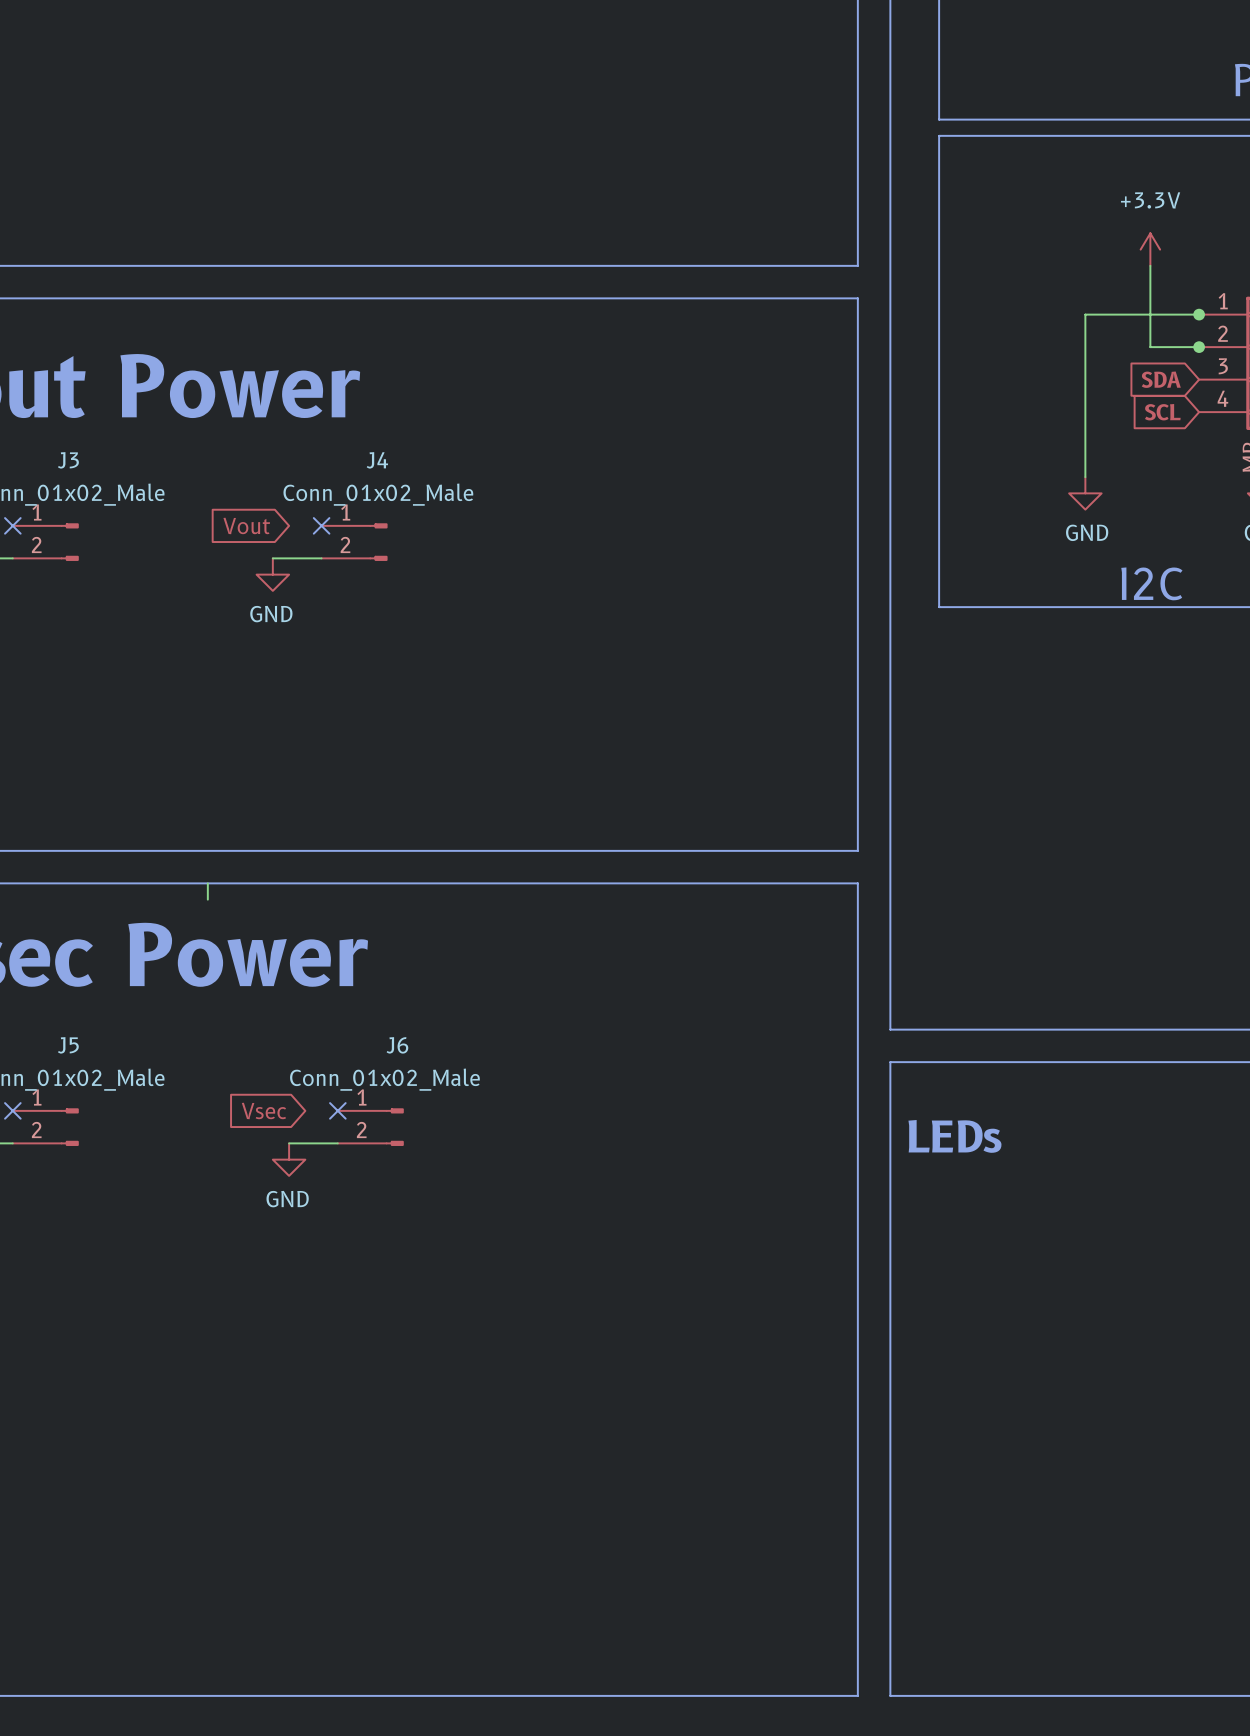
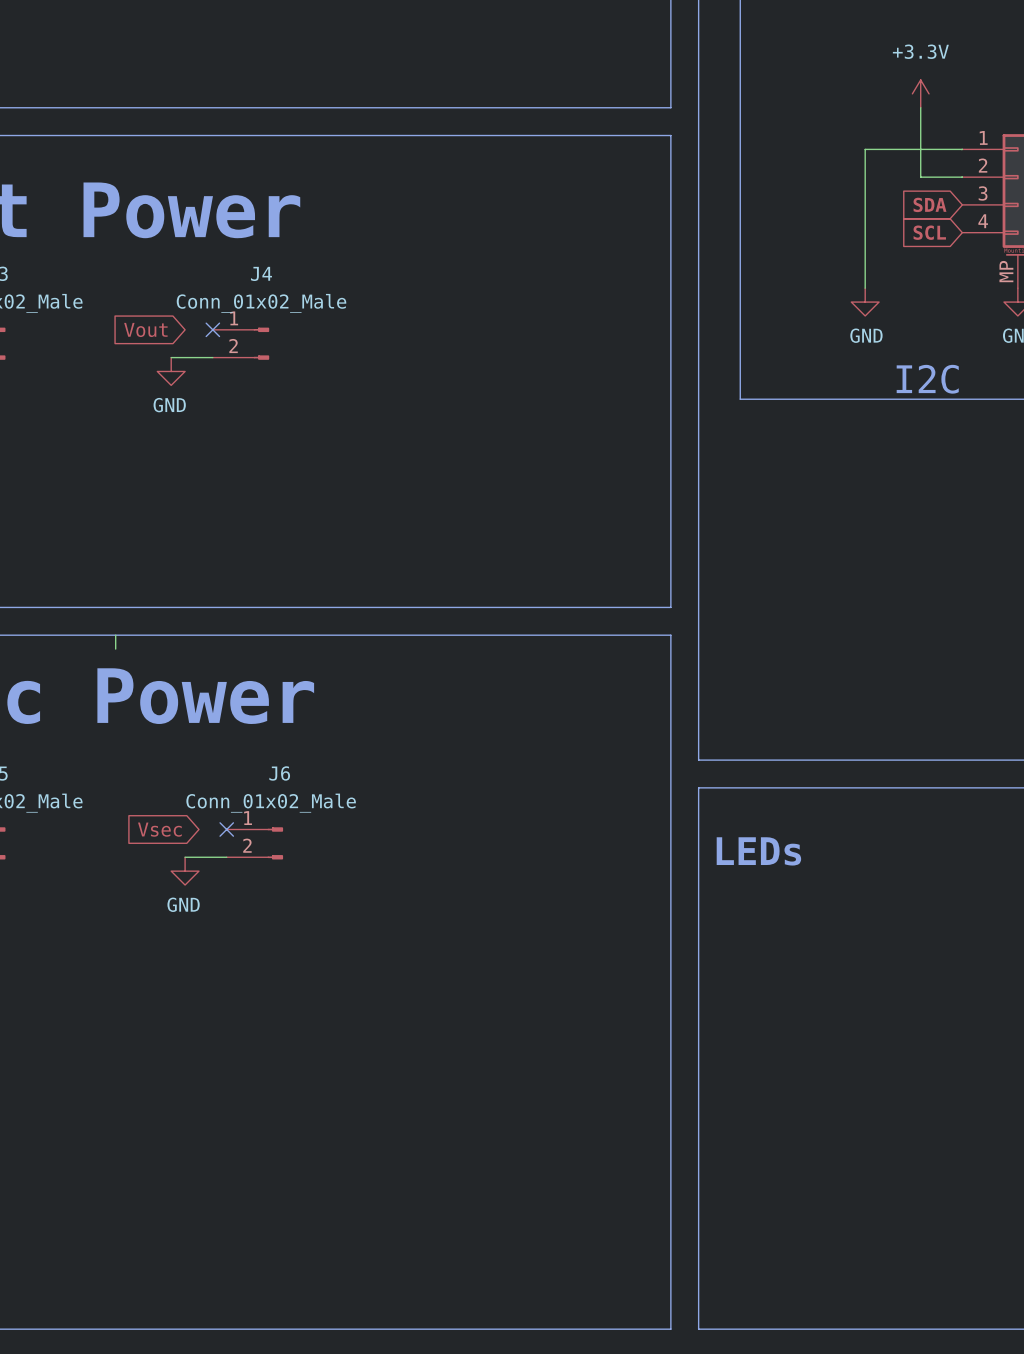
junction: (1199, 314) -> none
junction: (1199, 347) -> none

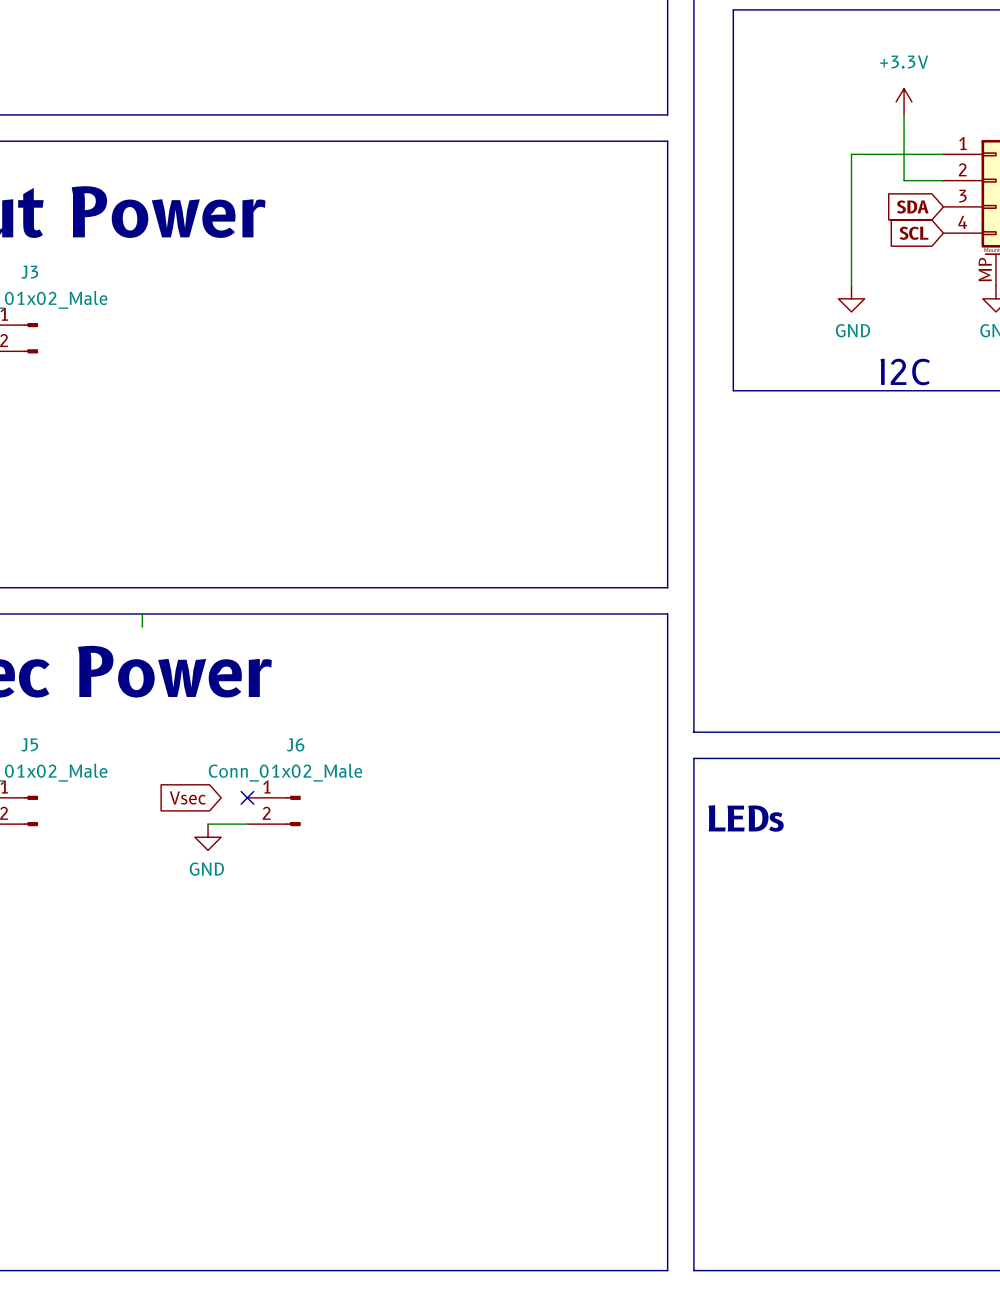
global label: Vout (145, 329) -> none
no-connect mark: (212, 329) -> none
J4: Conn_01x02_Male (241, 343) -> none
wire: (171, 357) (212, 357) -> none
power symbol: GND (171, 371) -> none

